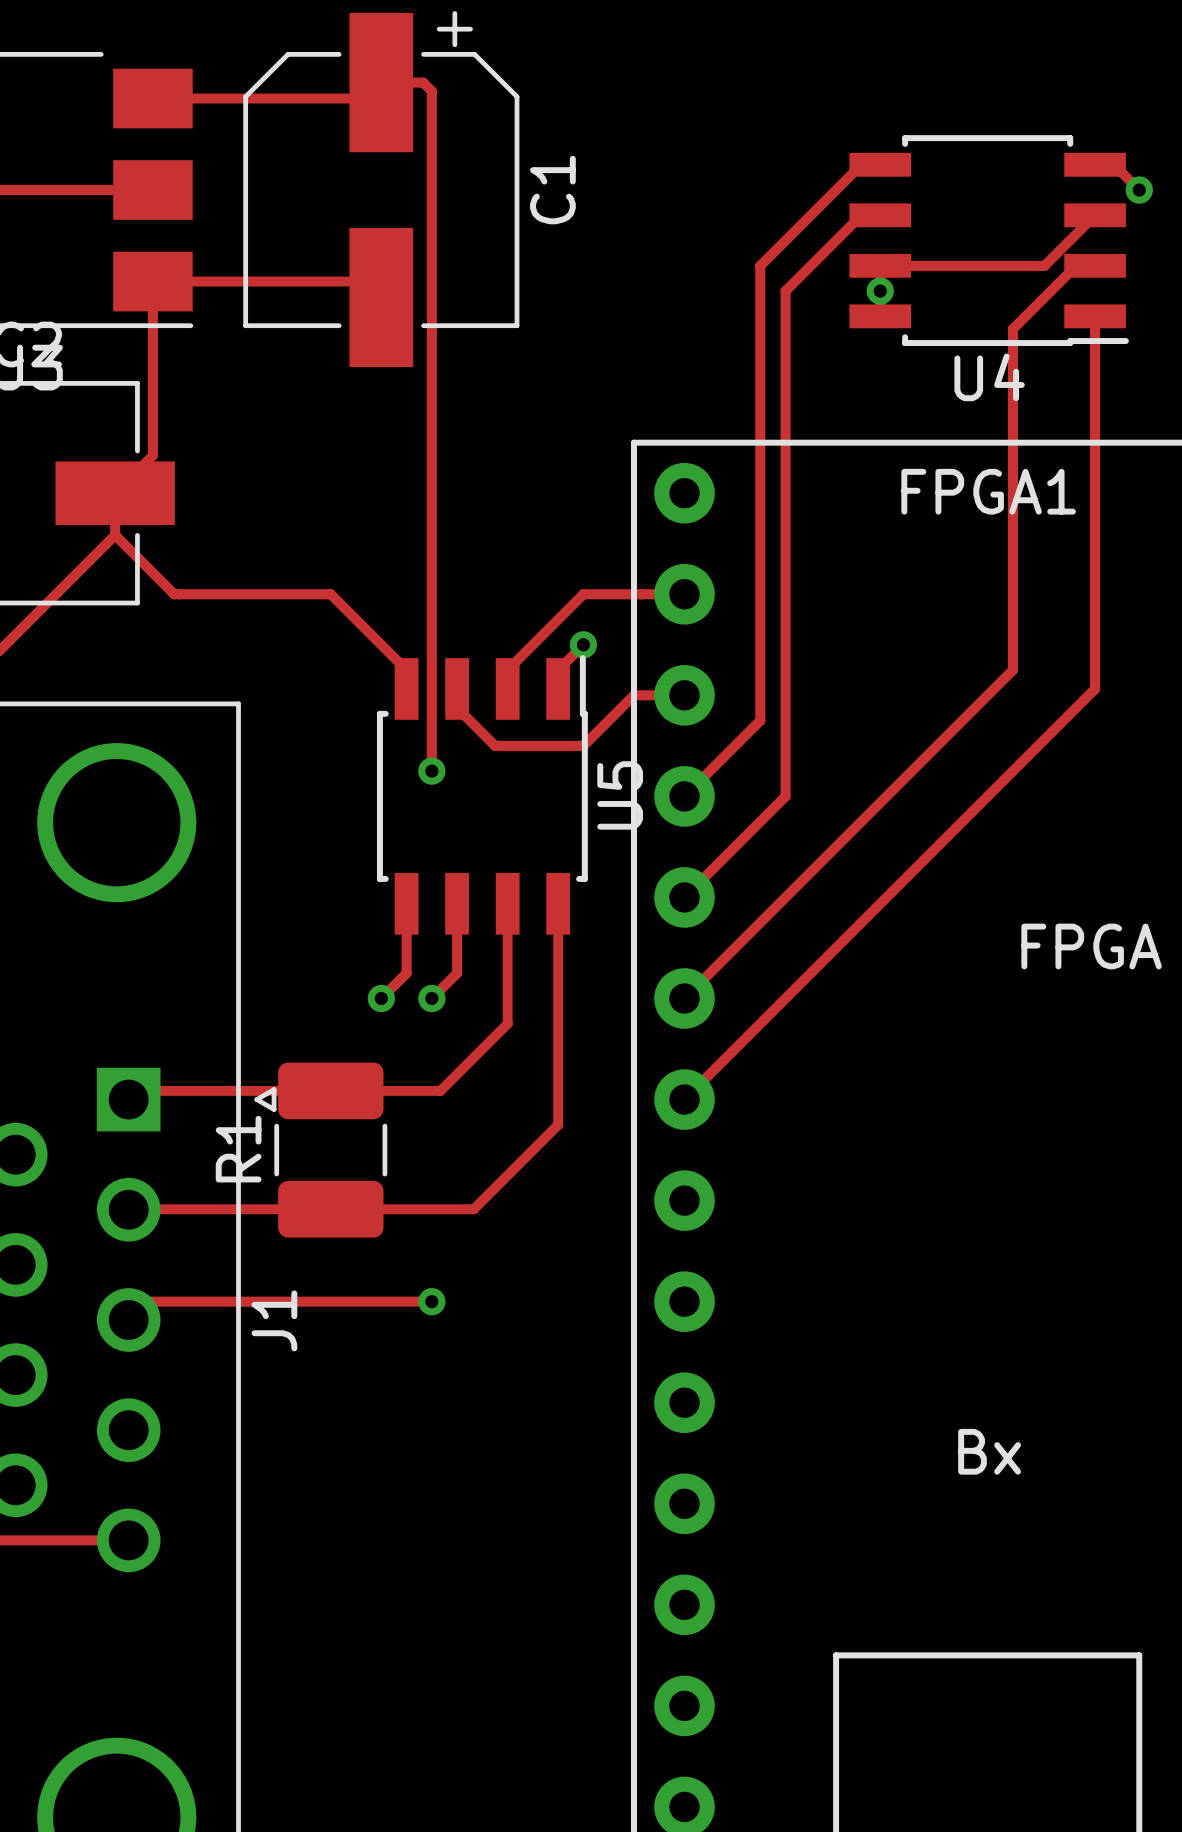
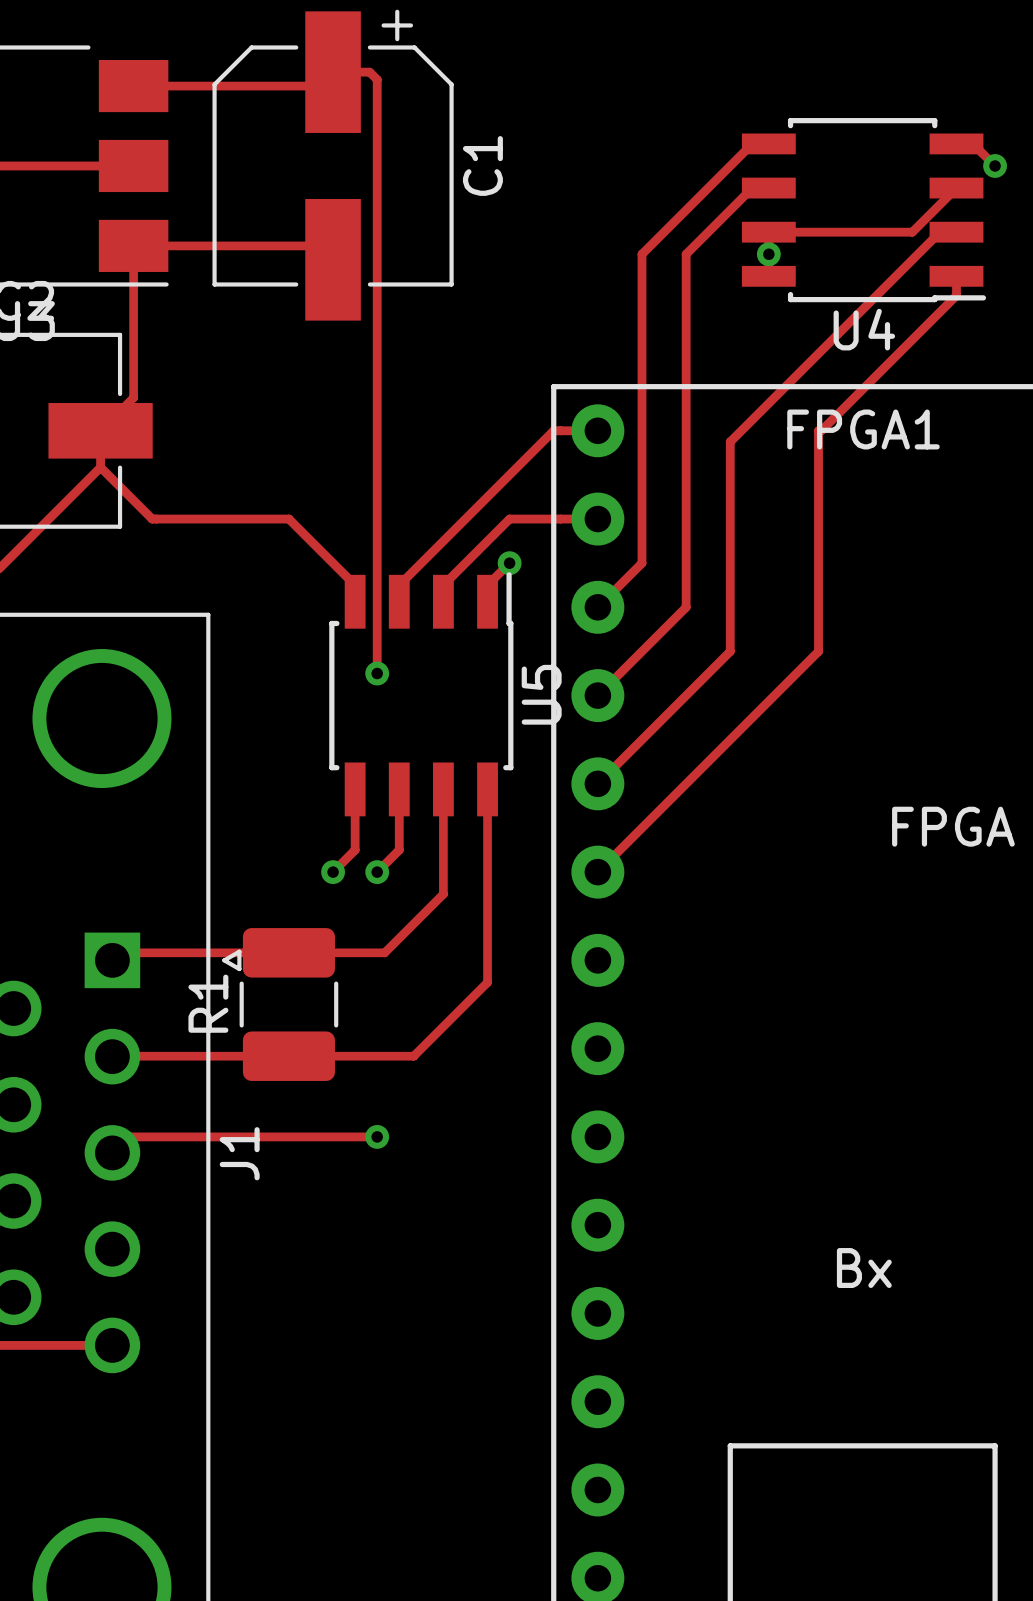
track: (760, 265) (760, 720) -> (664, 232) (642, 254) (642, 563) (597, 607)
track: (1012, 329) (1012, 670) (937, 745) -> (956, 295) (821, 430) (818, 430) (818, 651)
track: none -> (884, 287) (730, 441) (730, 651) (686, 695)
track: (1095, 338) (1095, 688) (684, 1099) -> none
track: (457, 688) (457, 707) (495, 745) (583, 745) (633, 695) (684, 695) -> (399, 601) (399, 585) (553, 430) (597, 430)
track: (785, 695) (785, 796) -> (686, 607) (664, 629)

